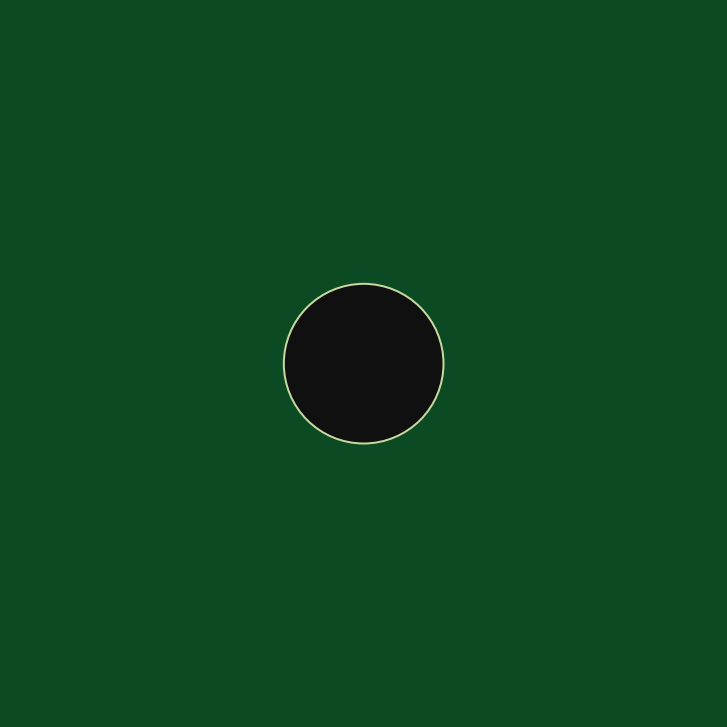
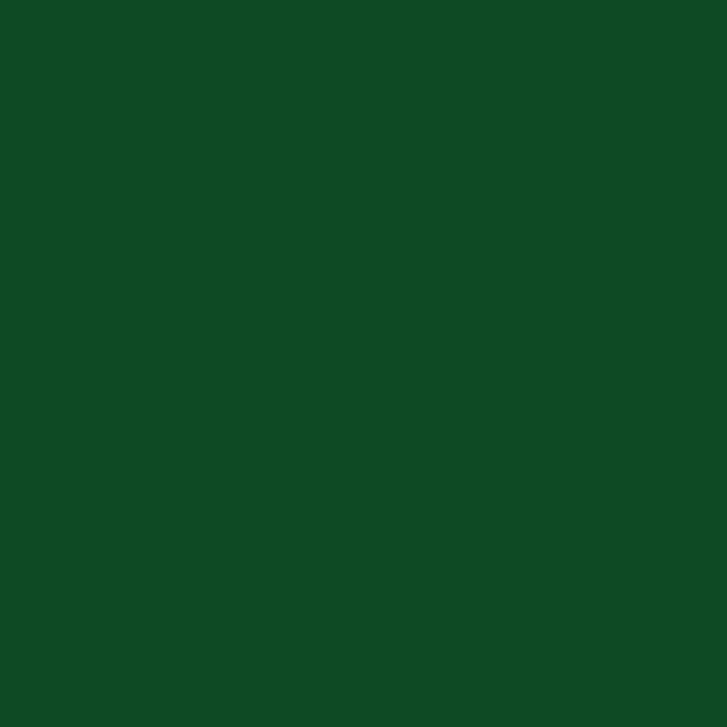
part: (363, 363) -> none

